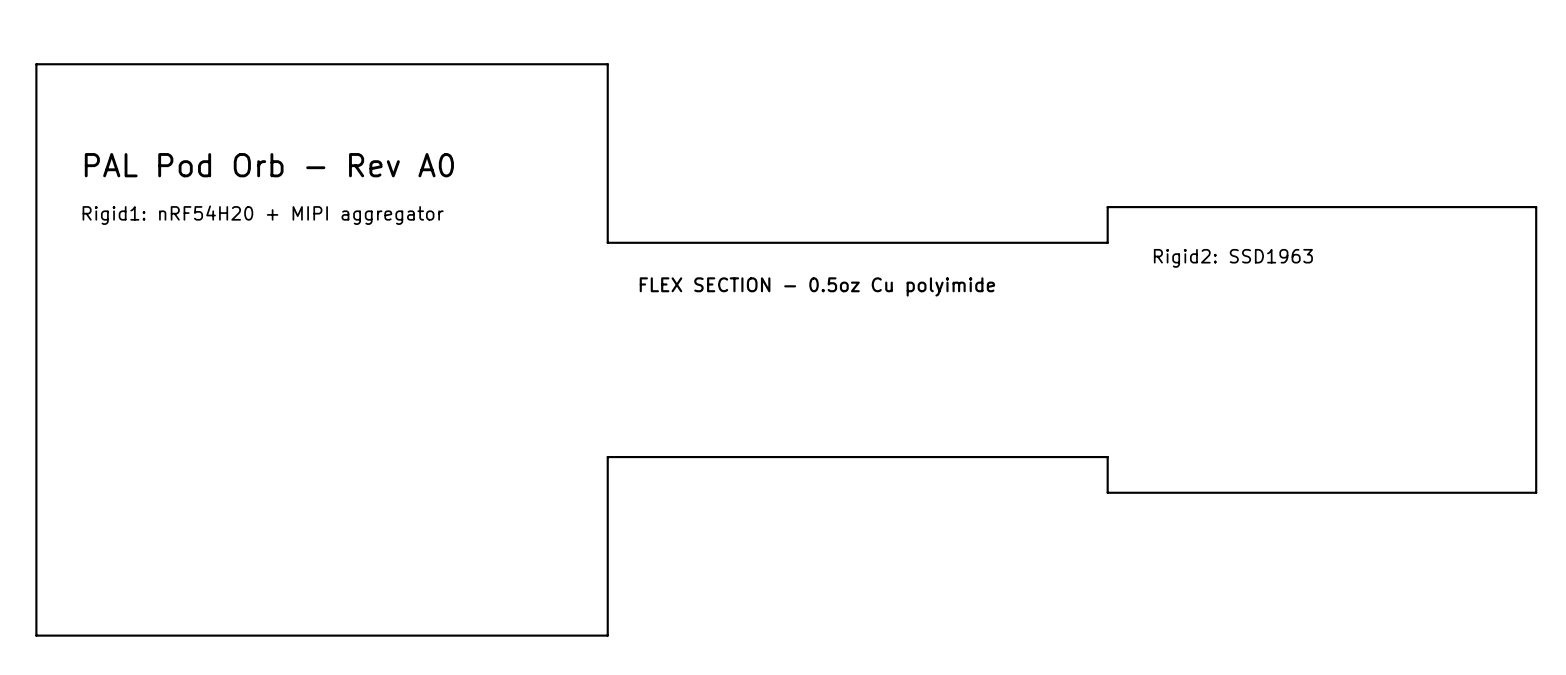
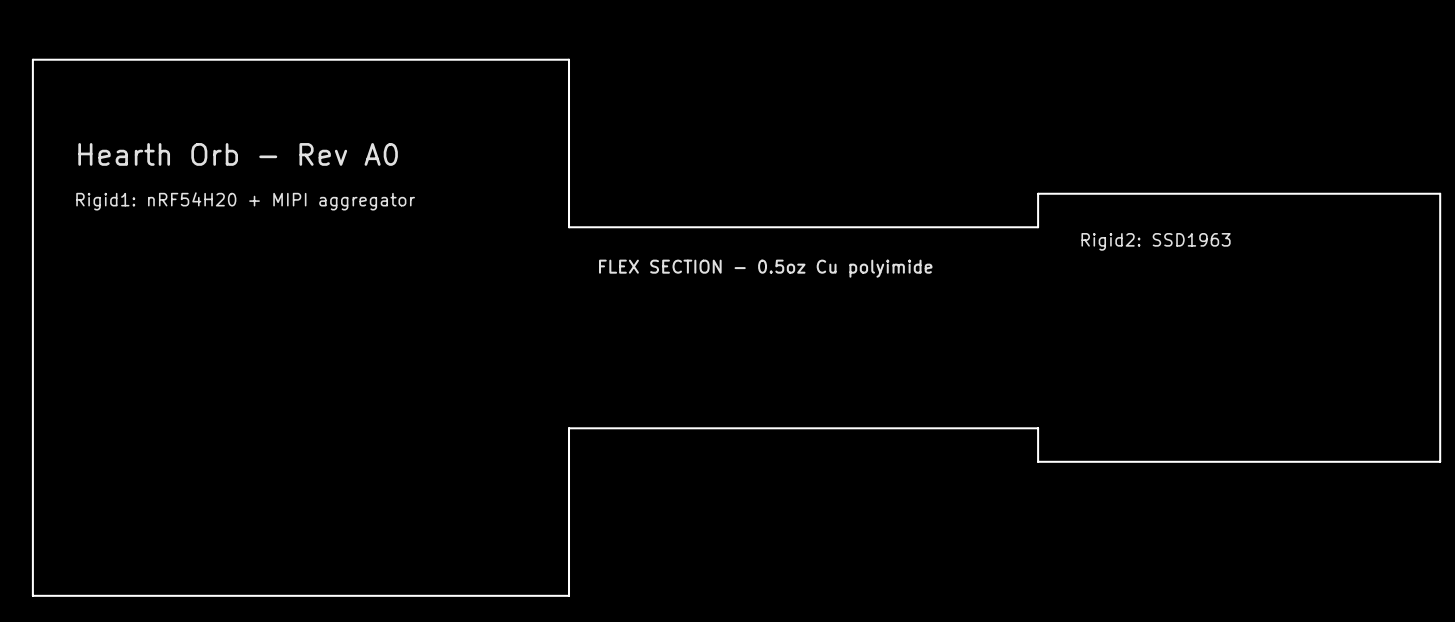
text: PAL Pod Orb - Rev A0 (269, 165) -> Hearth Orb - Rev A0 (238, 154)

